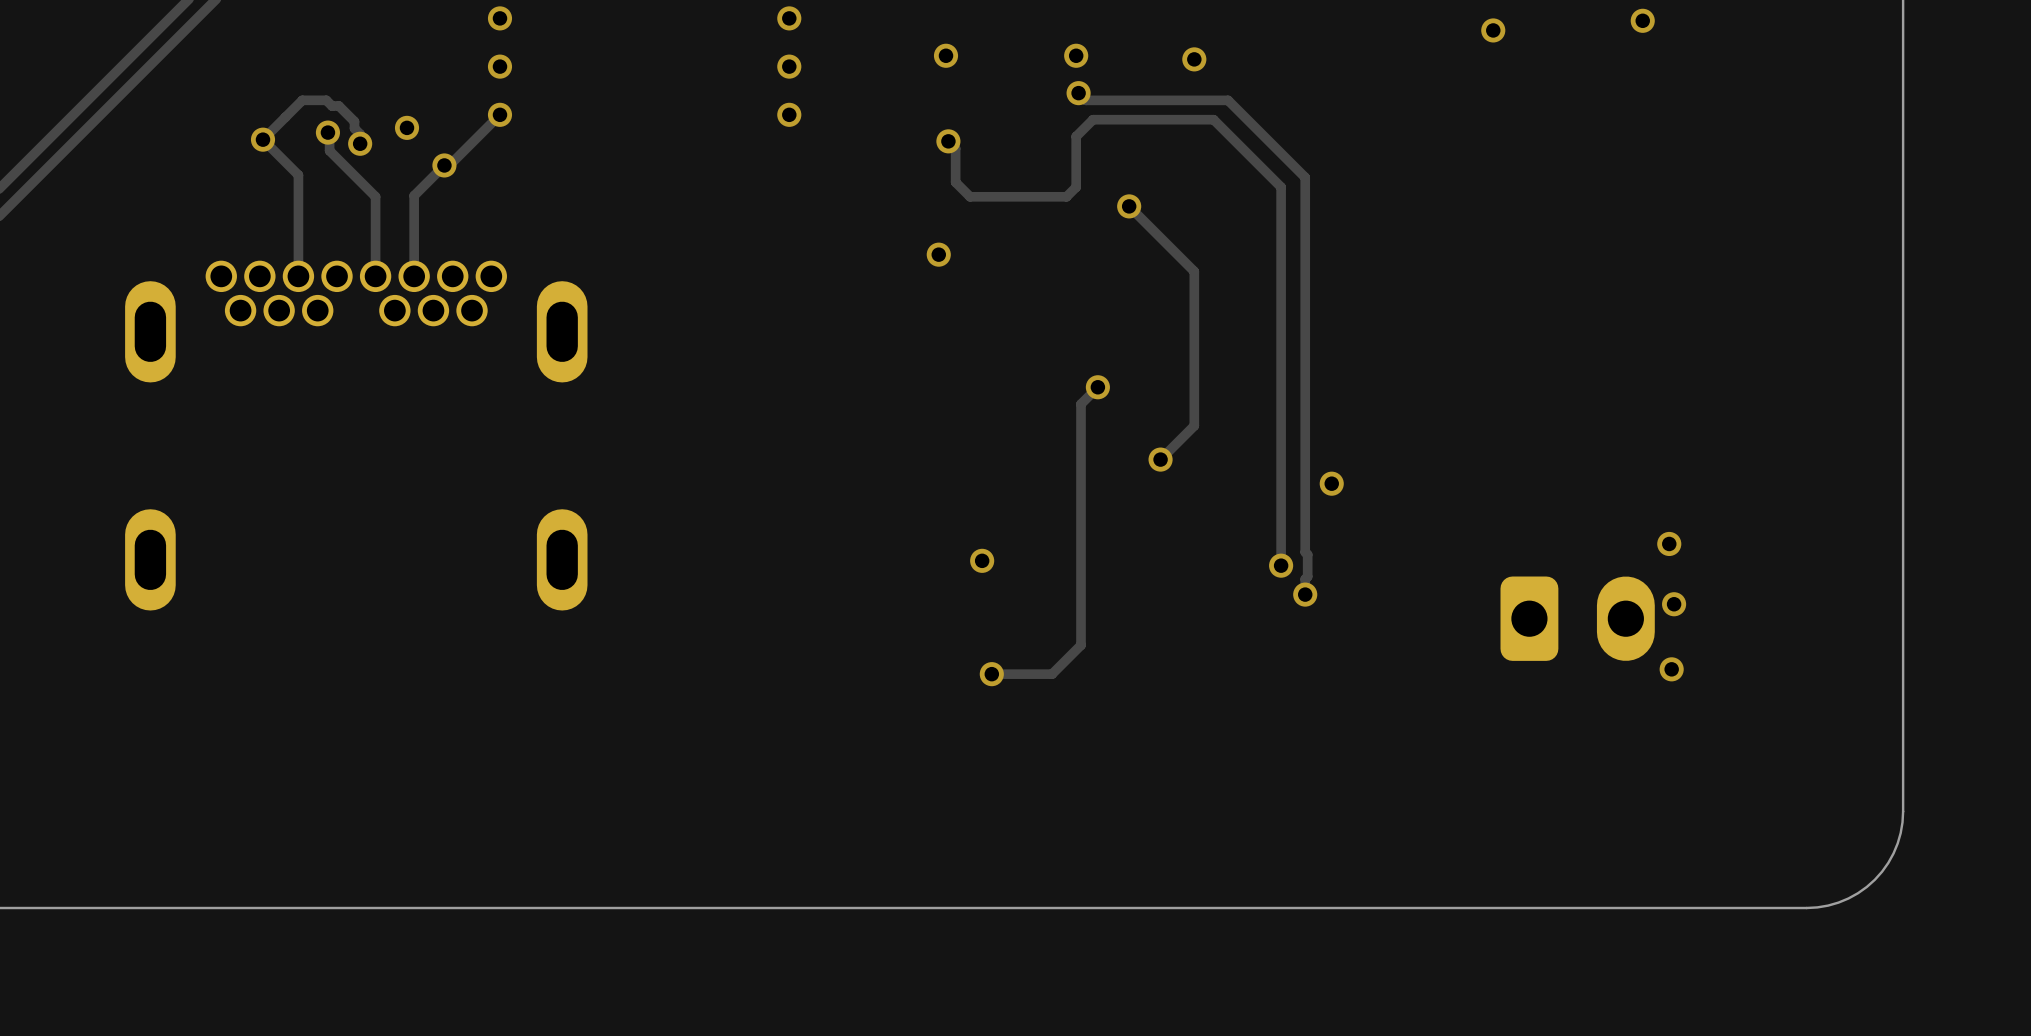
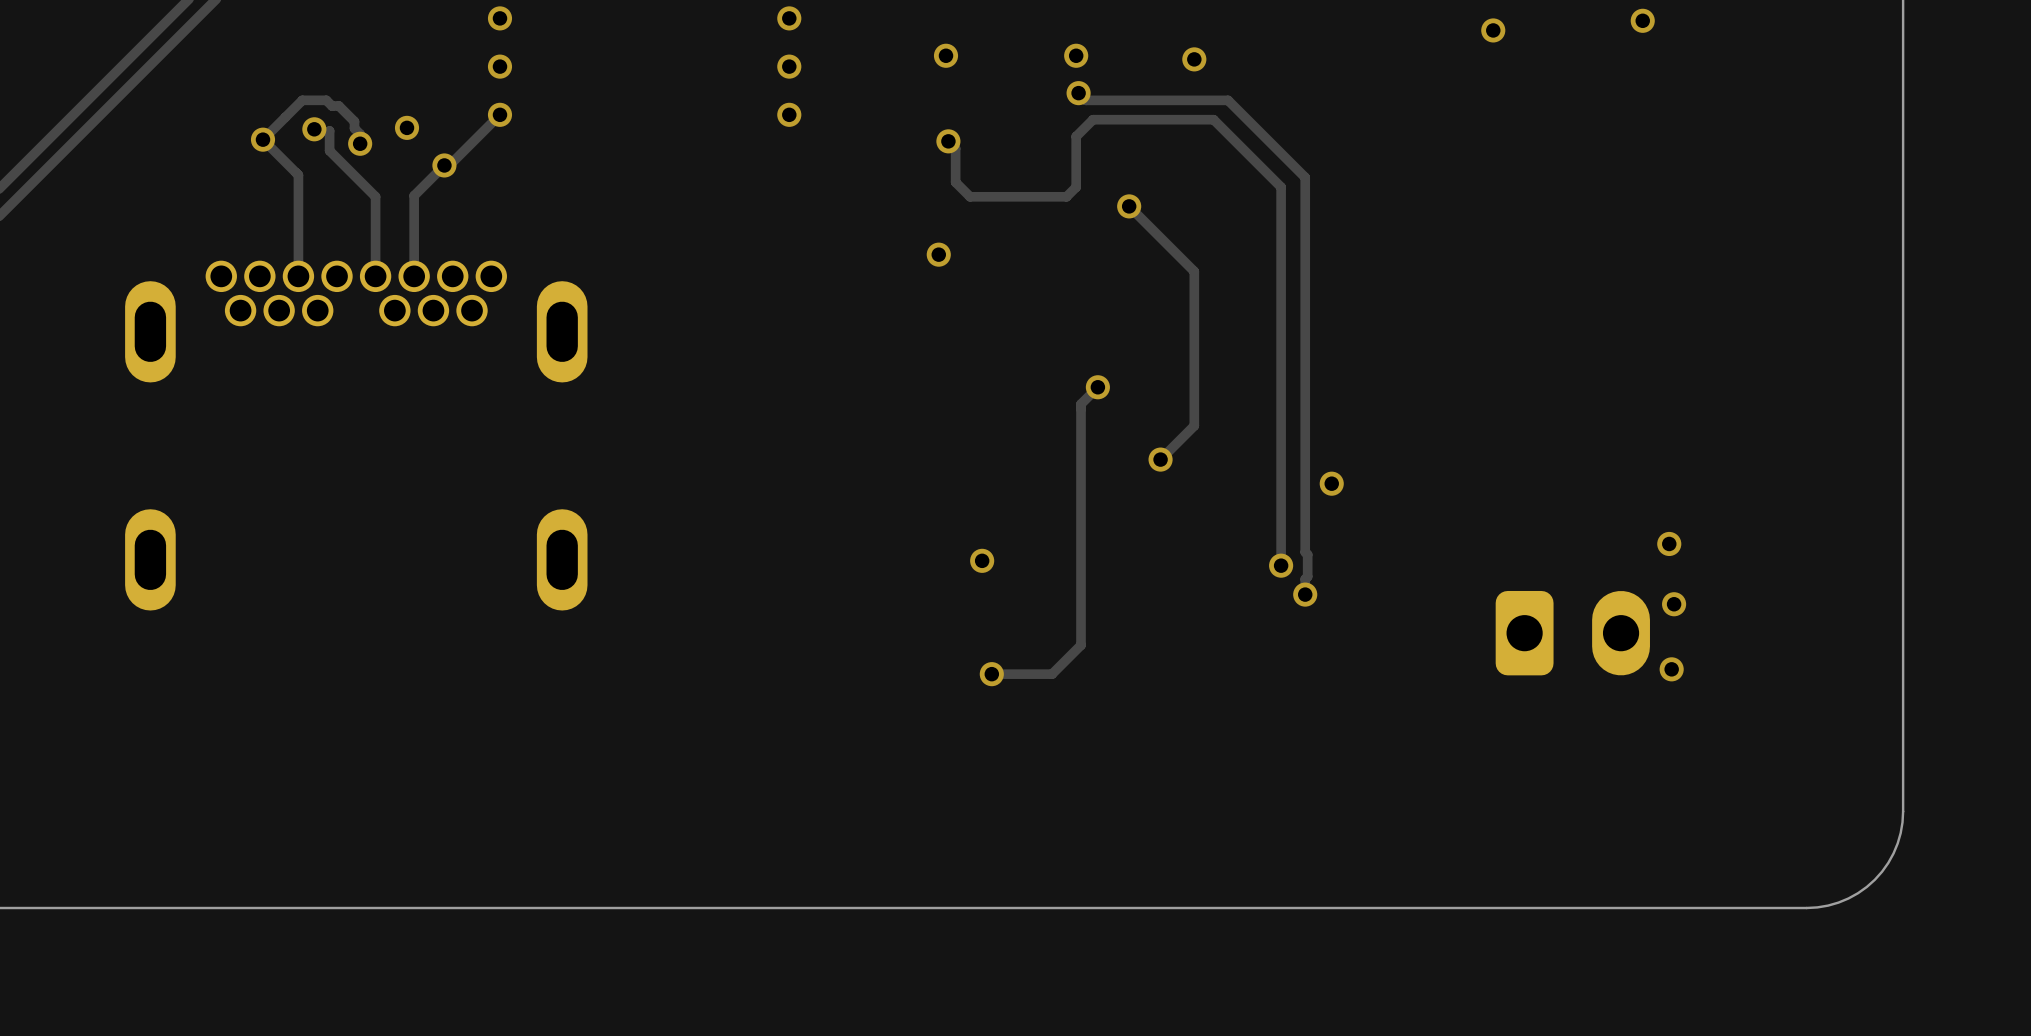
via position: (327, 132) -> (314, 129)
part position: (1577, 618) -> (1572, 633)

